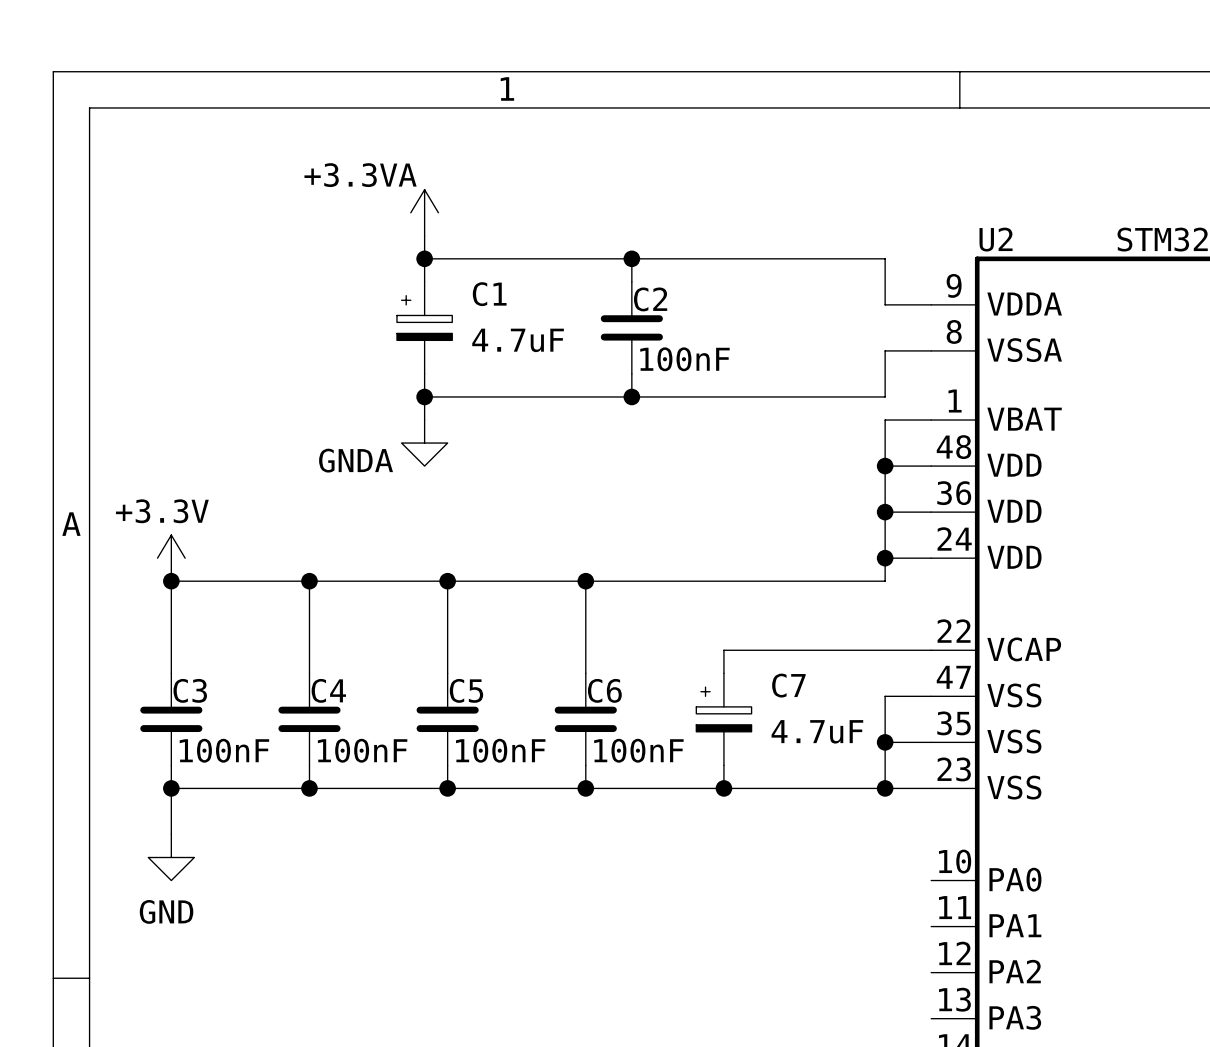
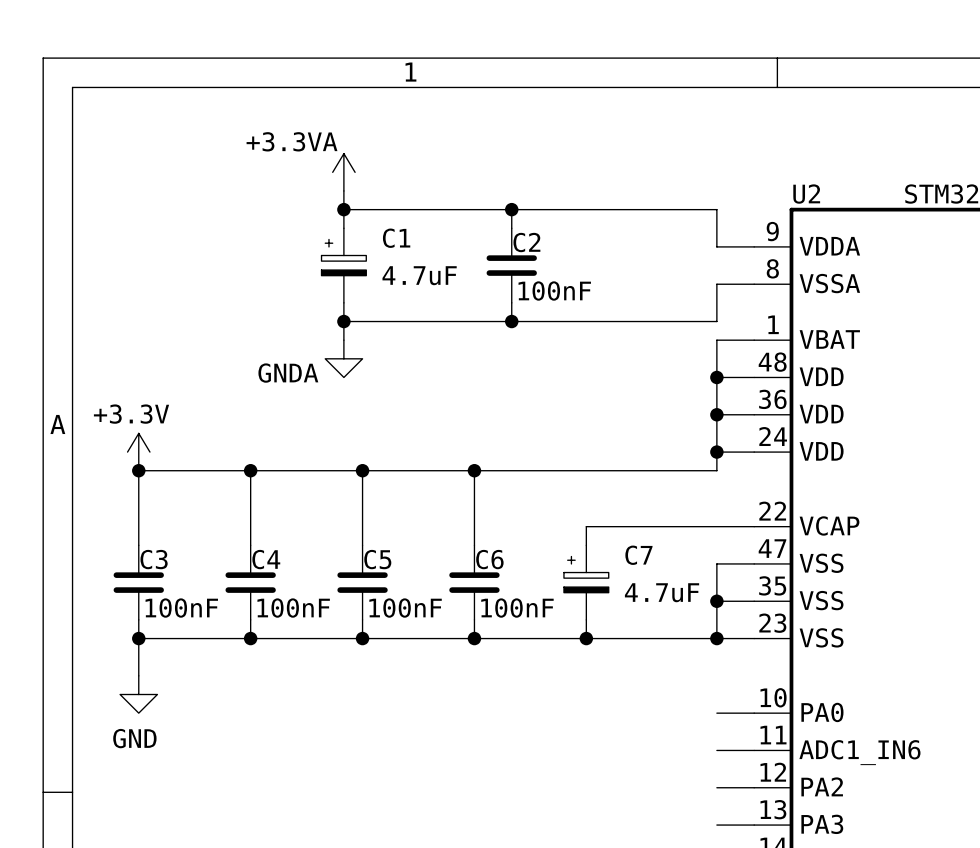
wire: none -> (716, 713) (754, 713)
U2 pin name: PA1 (1015, 925) -> ADC1_IN6 (859, 752)
wire: none -> (716, 750) (754, 750)
wire: none -> (716, 787) (754, 787)
wire: none -> (716, 825) (754, 825)

